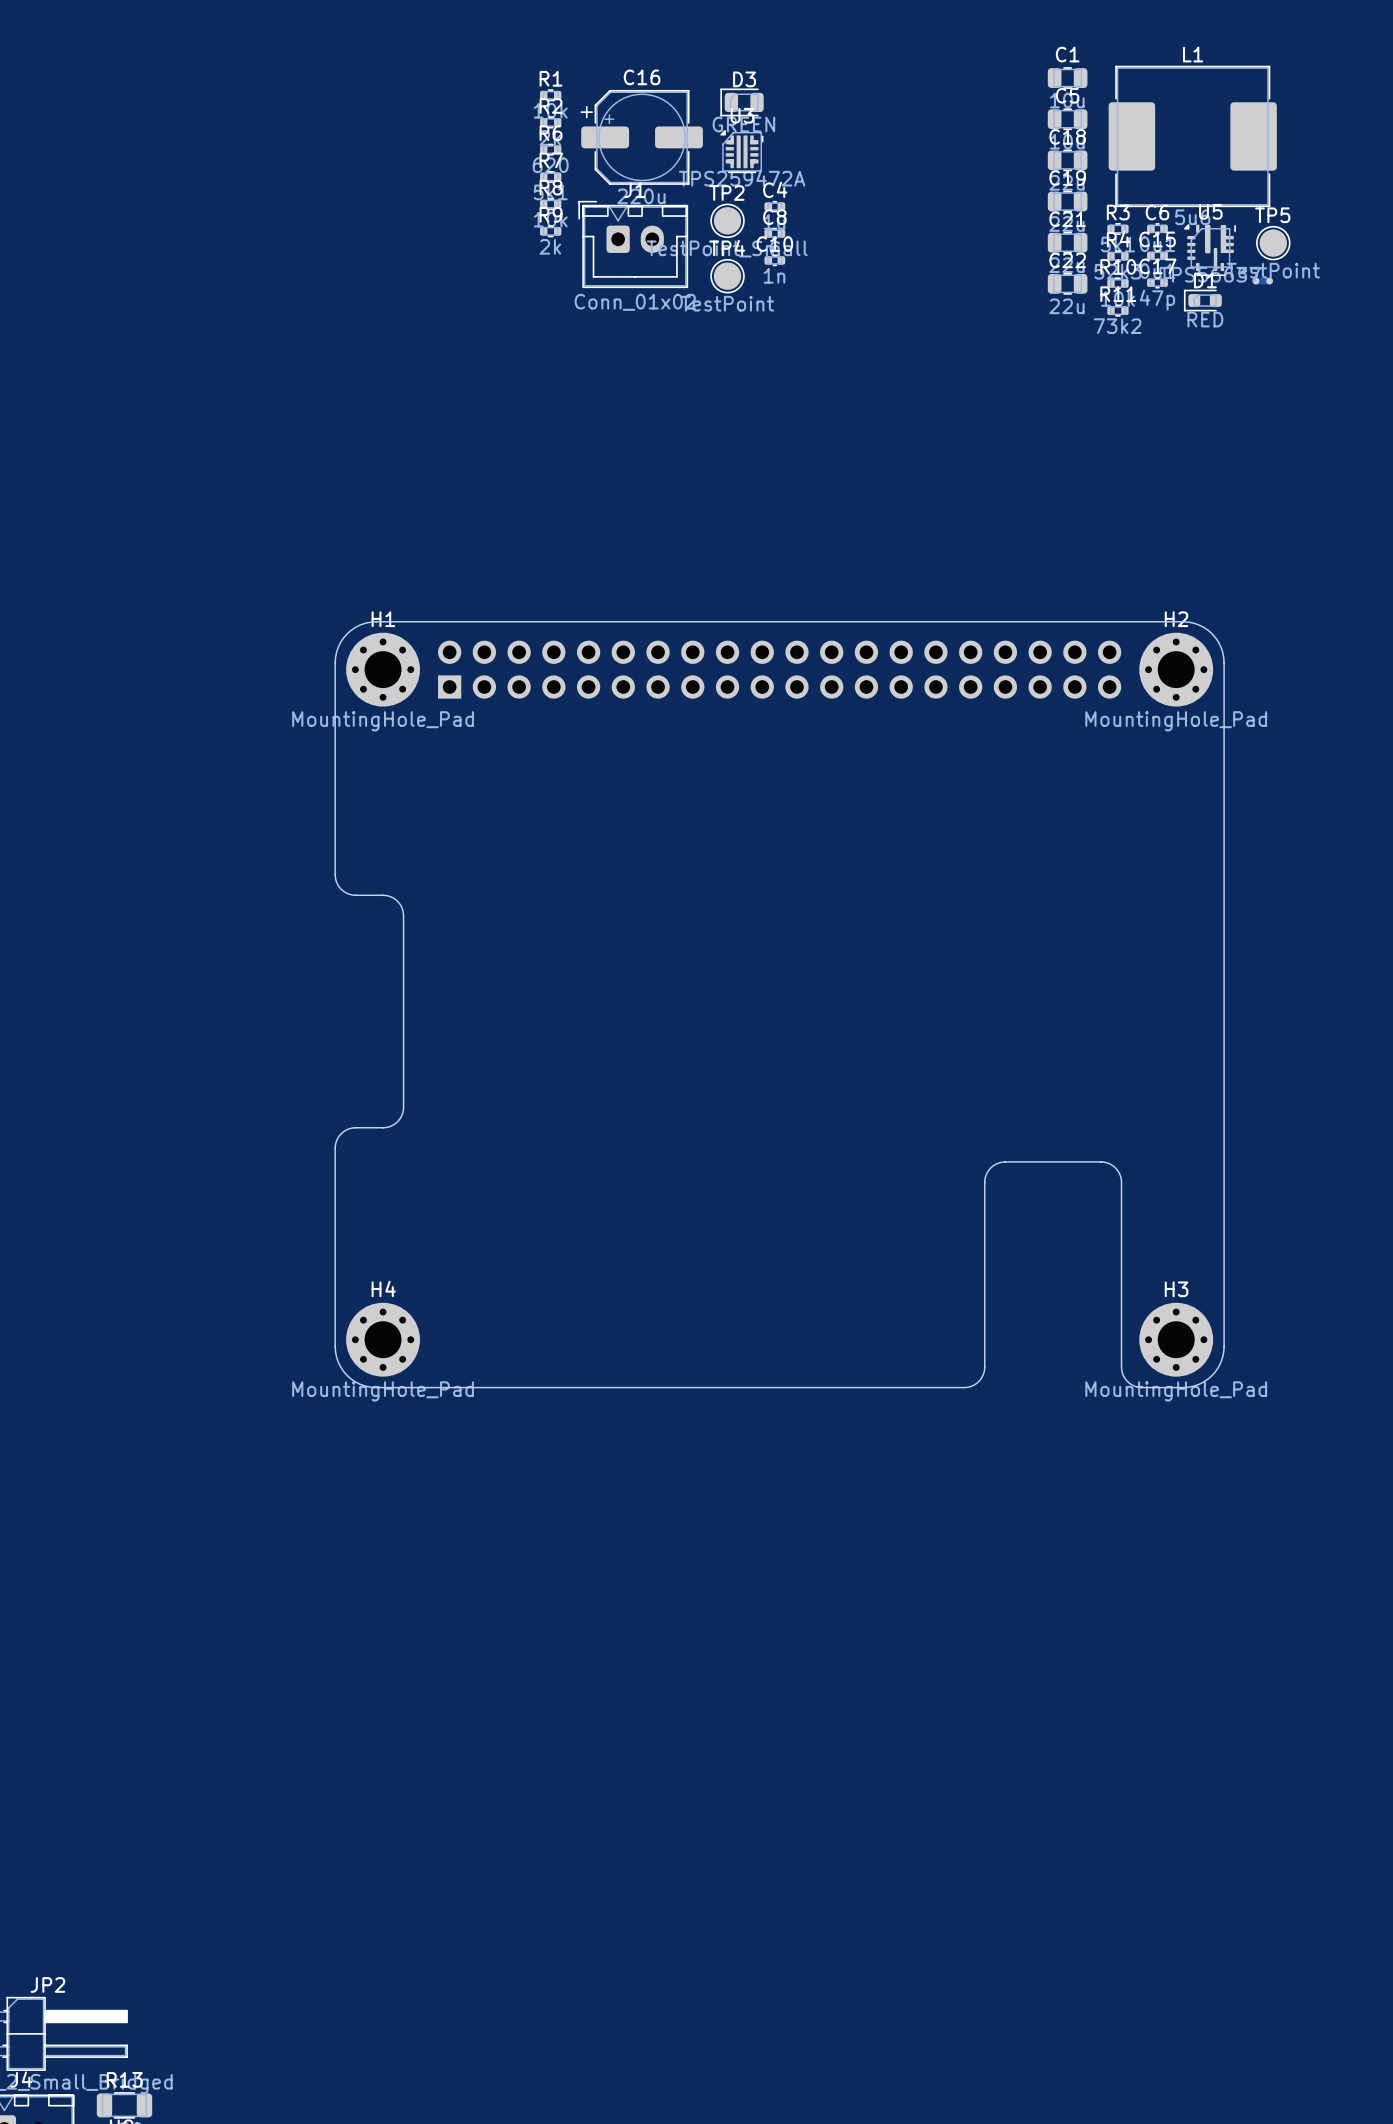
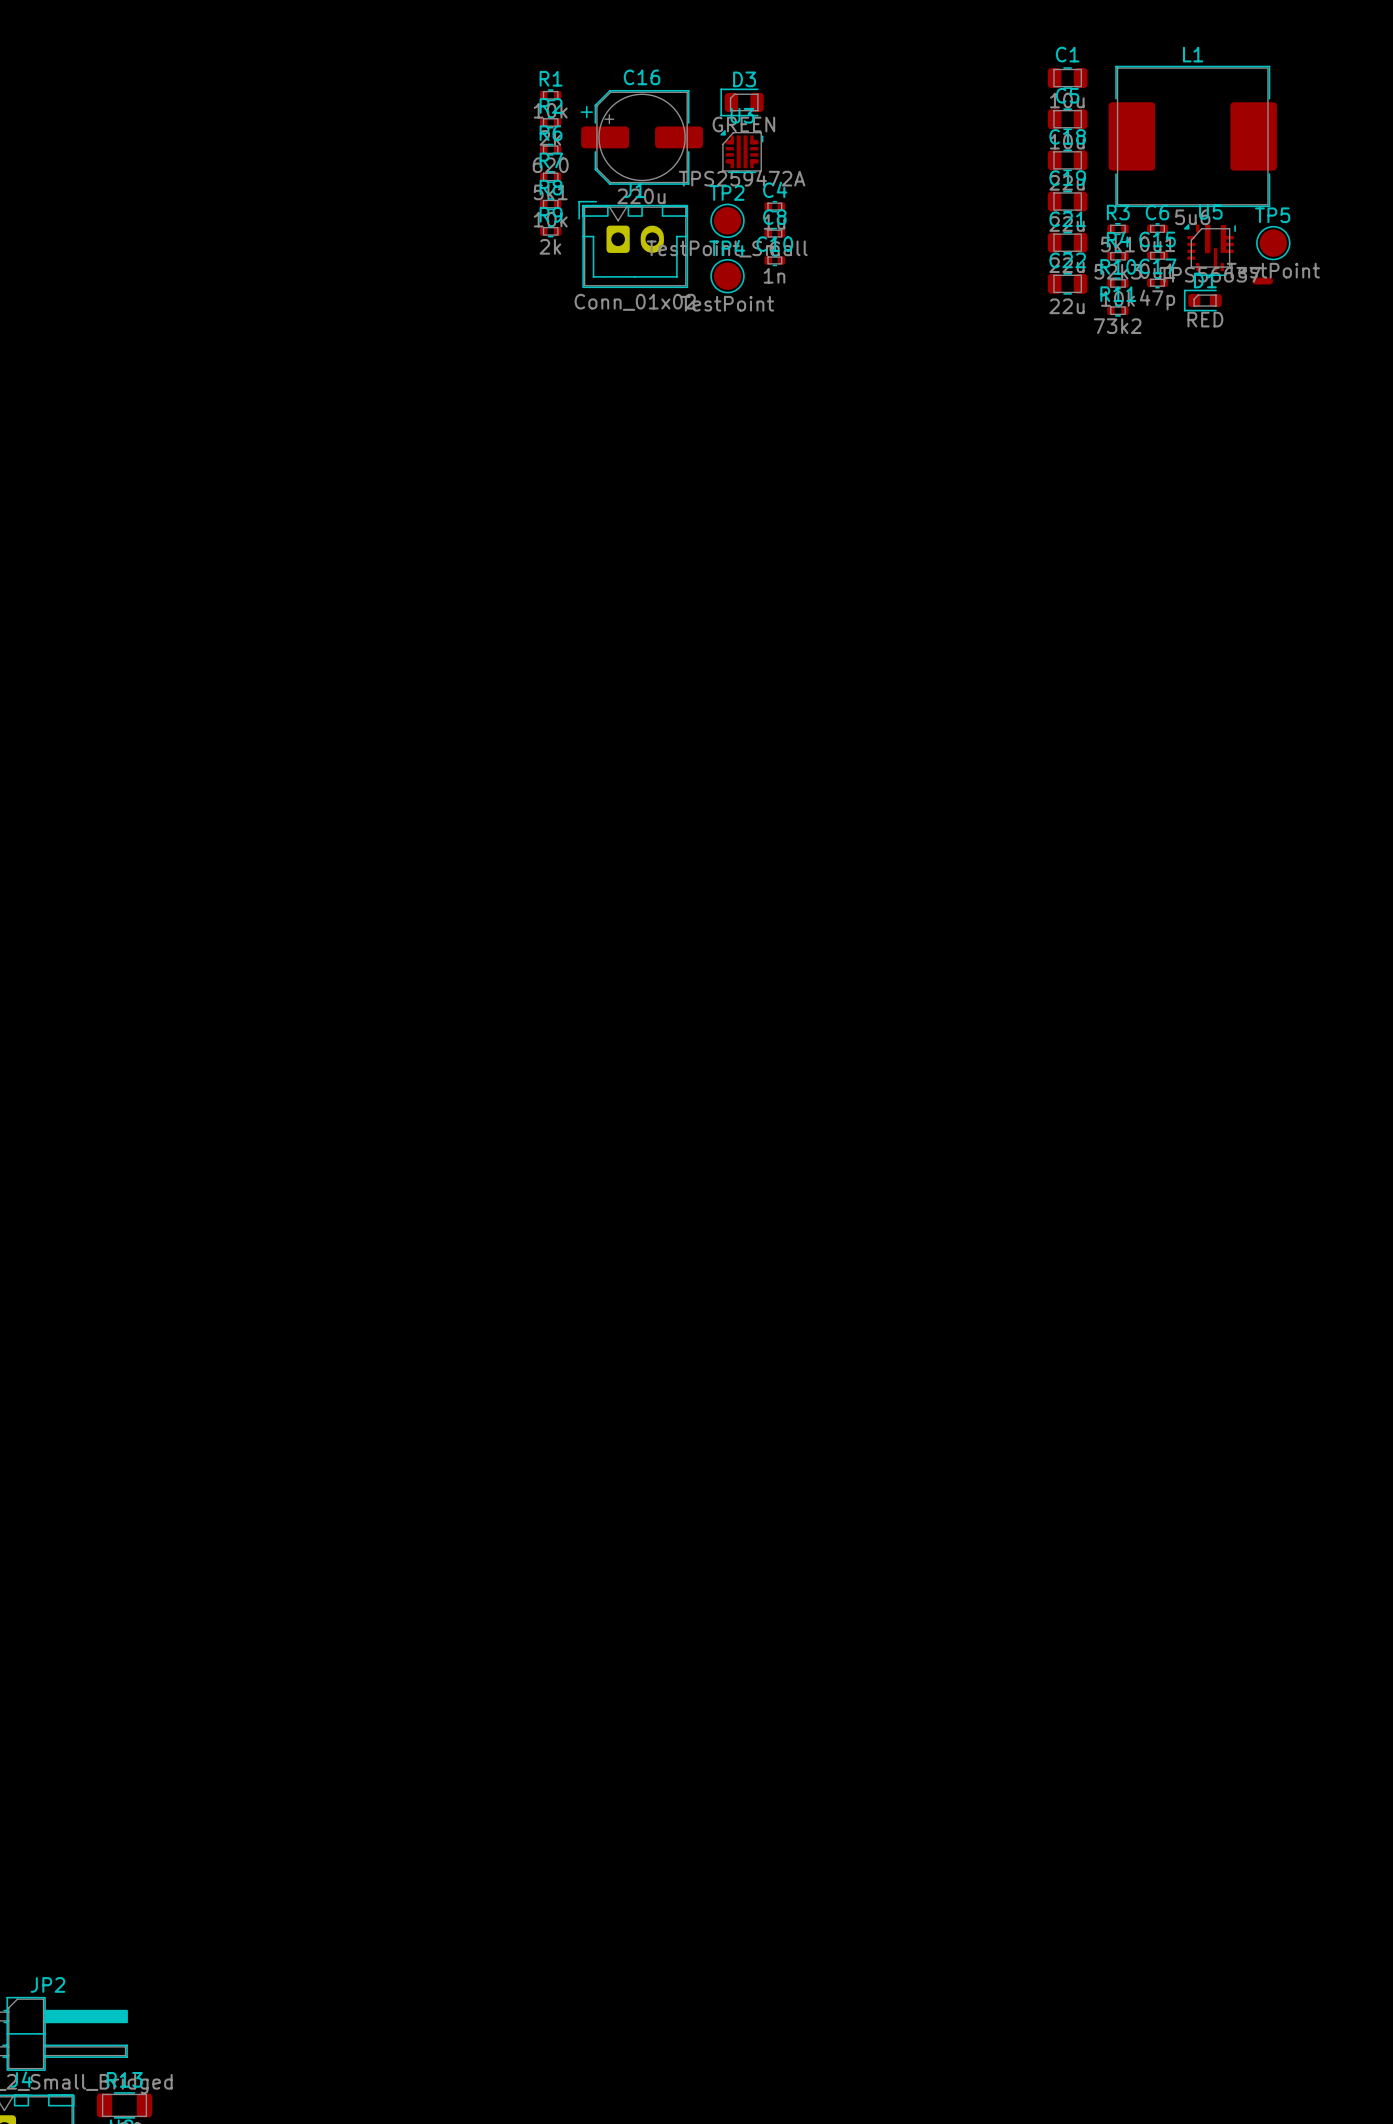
board edge: (376, 621) (1183, 621) (1198, 624) (1212, 633) (1220, 647) (1224, 662) (1224, 1346) (1220, 1362) (1212, 1375) (1198, 1384) (1188, 1387) (1142, 1387) (1131, 1384) (1123, 1374) (1121, 1182) (1119, 1174) (1115, 1167) (1108, 1163) (1101, 1161) (1005, 1161) (997, 1163) (990, 1167) (984, 1179) (984, 1369) (978, 1381) (969, 1386) (376, 1387) (360, 1384) (347, 1375) (338, 1362) (335, 1346) (335, 1142) (341, 1133) (350, 1128) (385, 1127) (393, 1125) (400, 1117) (403, 1107) (402, 910) (397, 901) (388, 895) (353, 895) (345, 892) (337, 885) (335, 874) (335, 657) (340, 642) (347, 633) (360, 624) (376, 621) -> none
H1: MountingHole_Pad (383, 669) -> none
part: (779, 669) -> none
H2: MountingHole_Pad (1176, 669) -> none
H4: MountingHole_Pad (383, 1339) -> none
H3: MountingHole_Pad (1176, 1339) -> none

